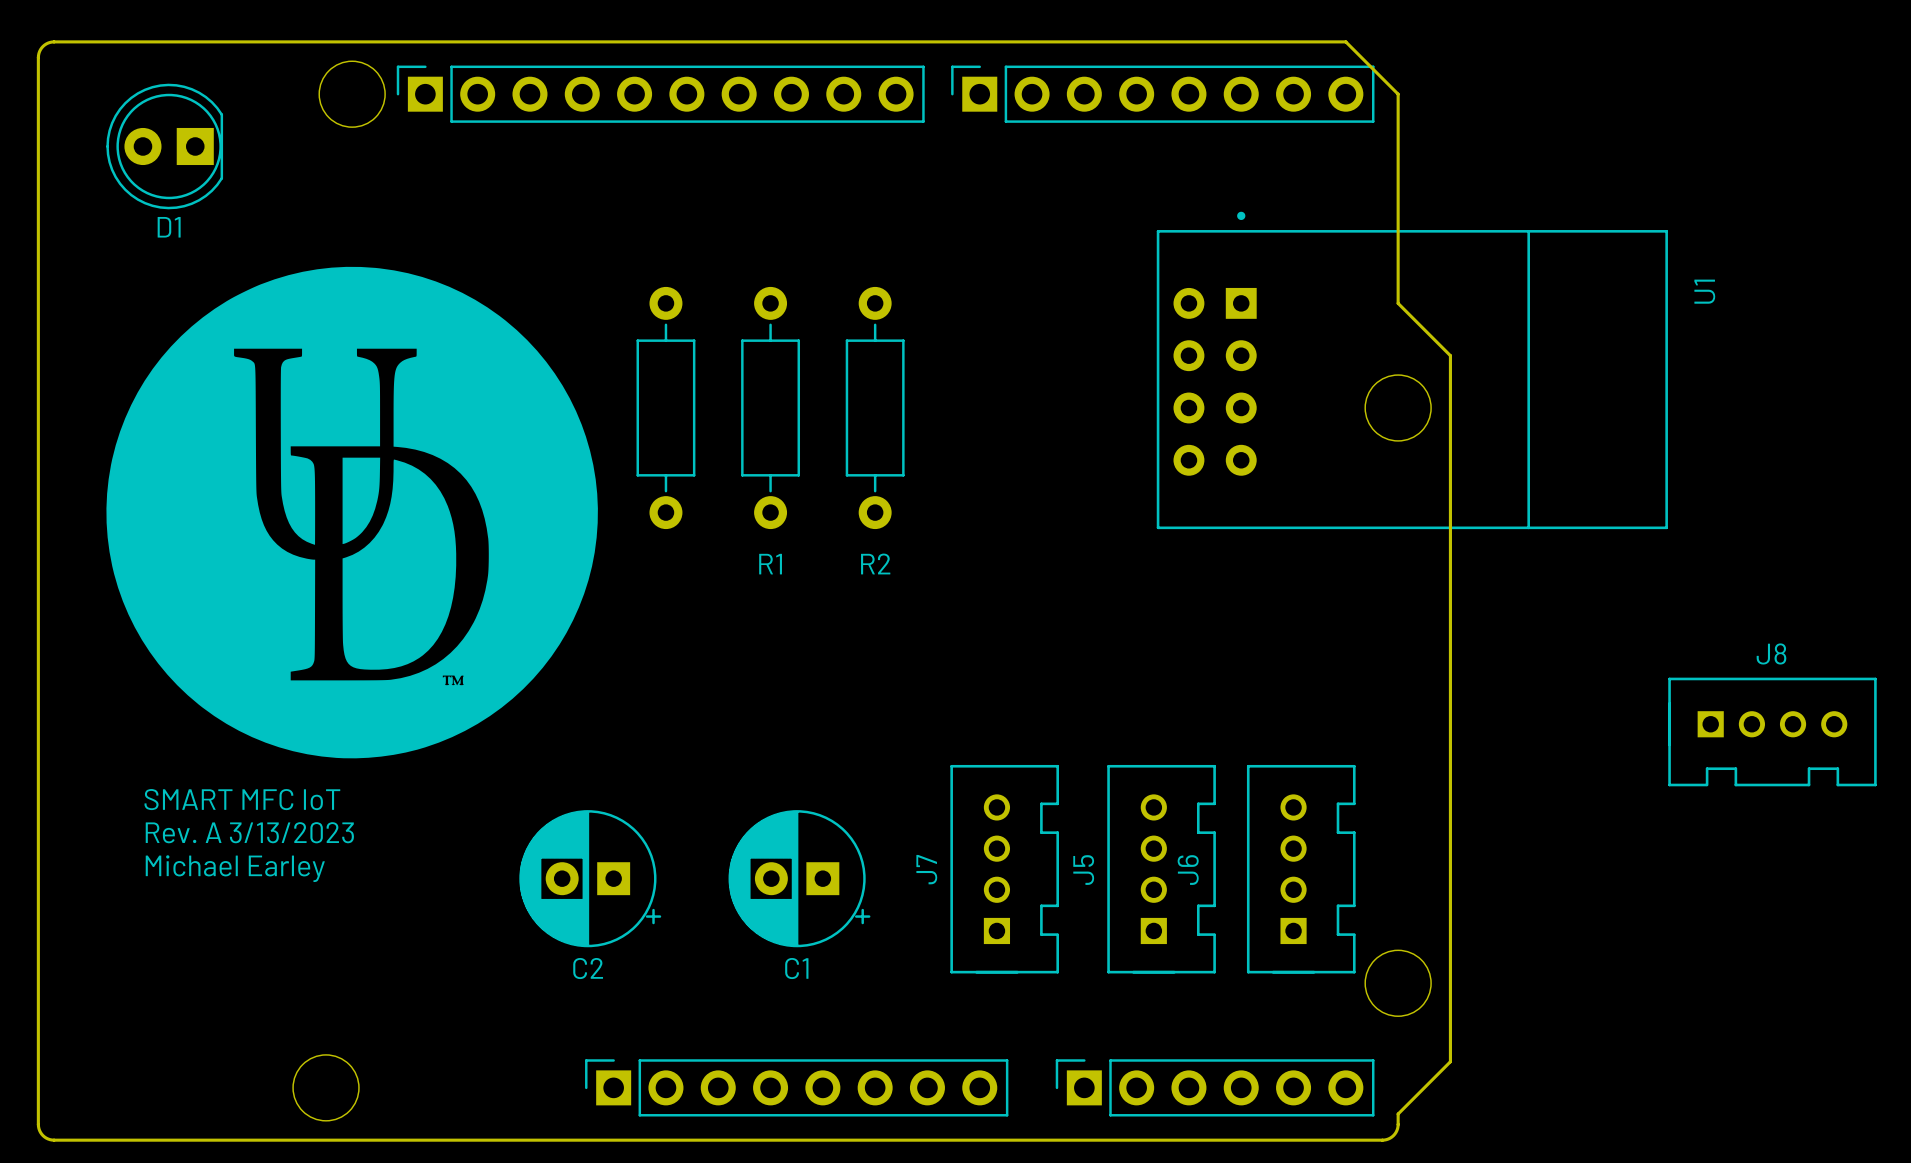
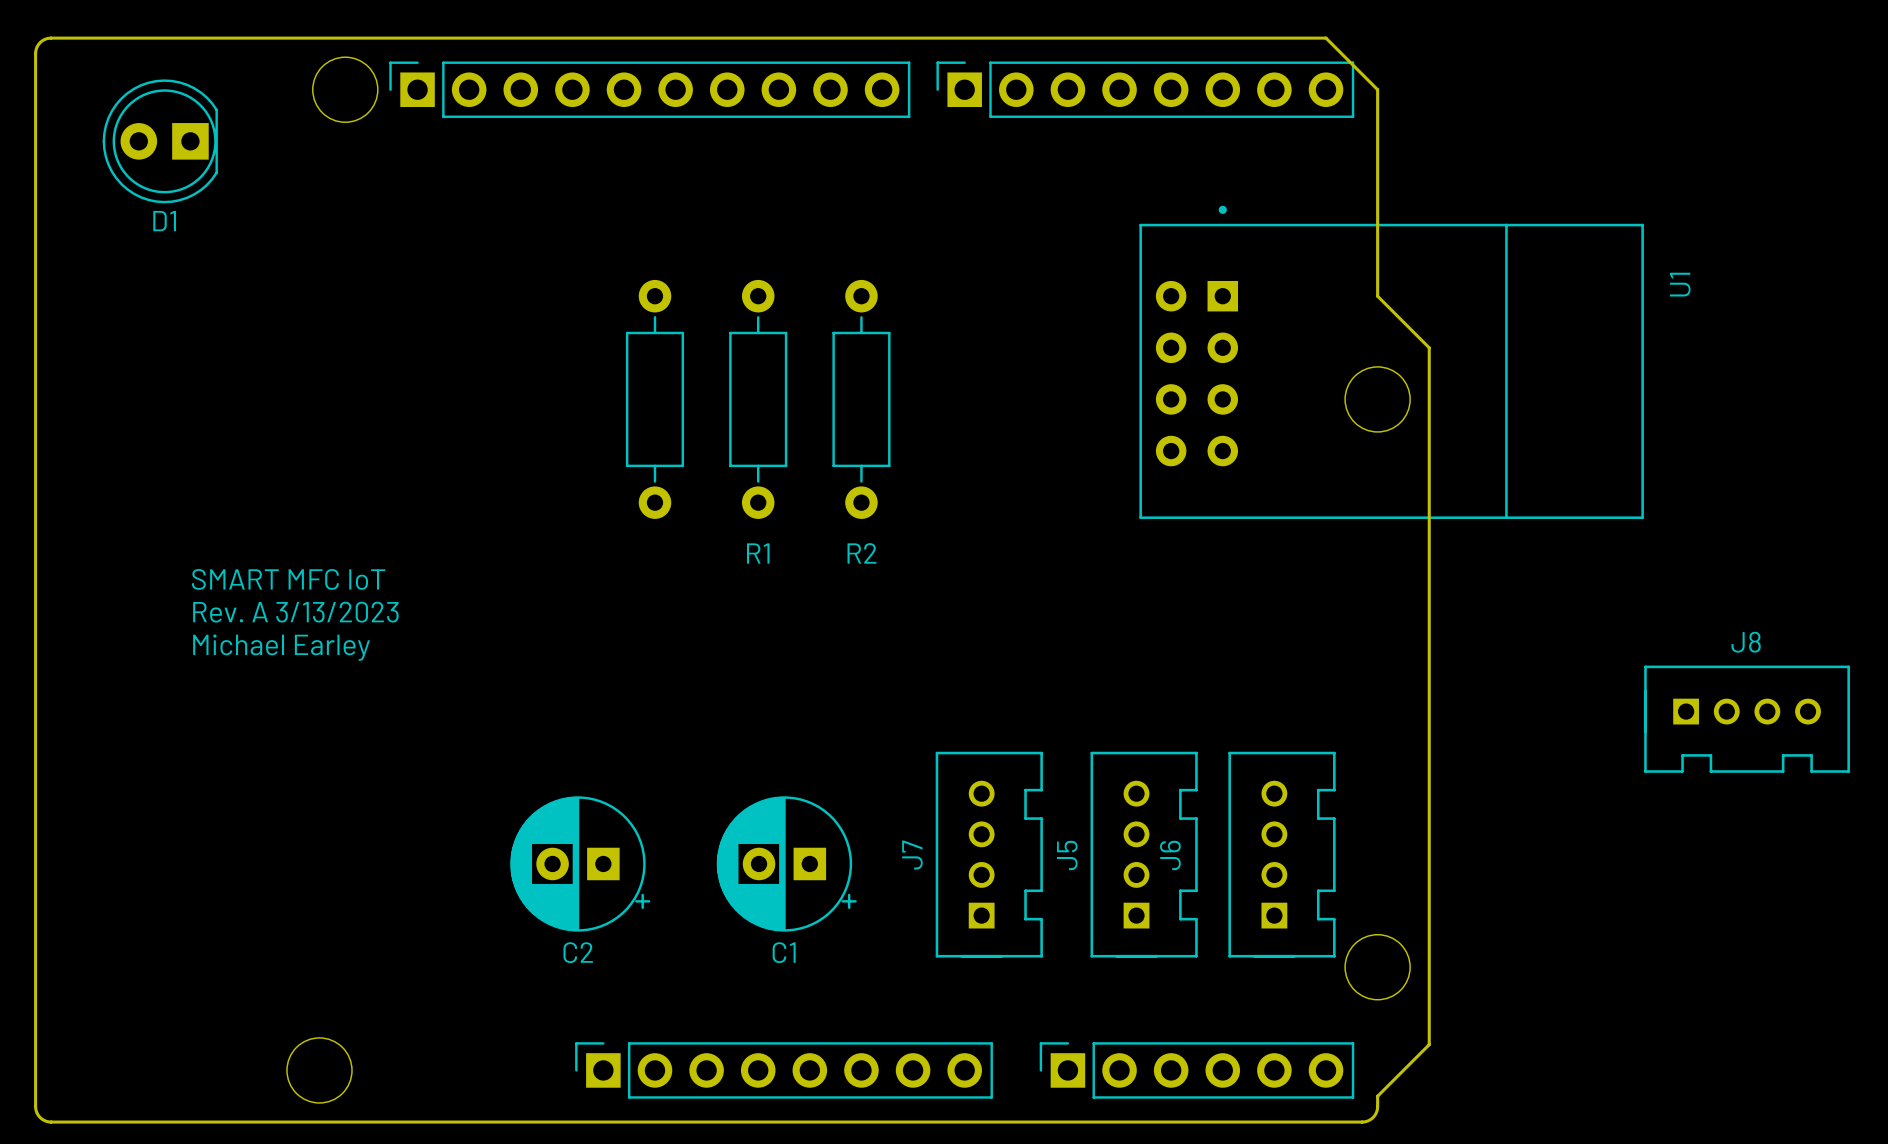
drawing: [106, 266, 598, 759] -> none
text position: SMART MFC IoT (242, 799) -> SMART MFC IoT (288, 579)
text position: Rev. A 3/13/2023 (249, 832) -> Rev. A 3/13/2023 (295, 612)
text position: Michael Earley (235, 868) -> Michael Earley (281, 647)

